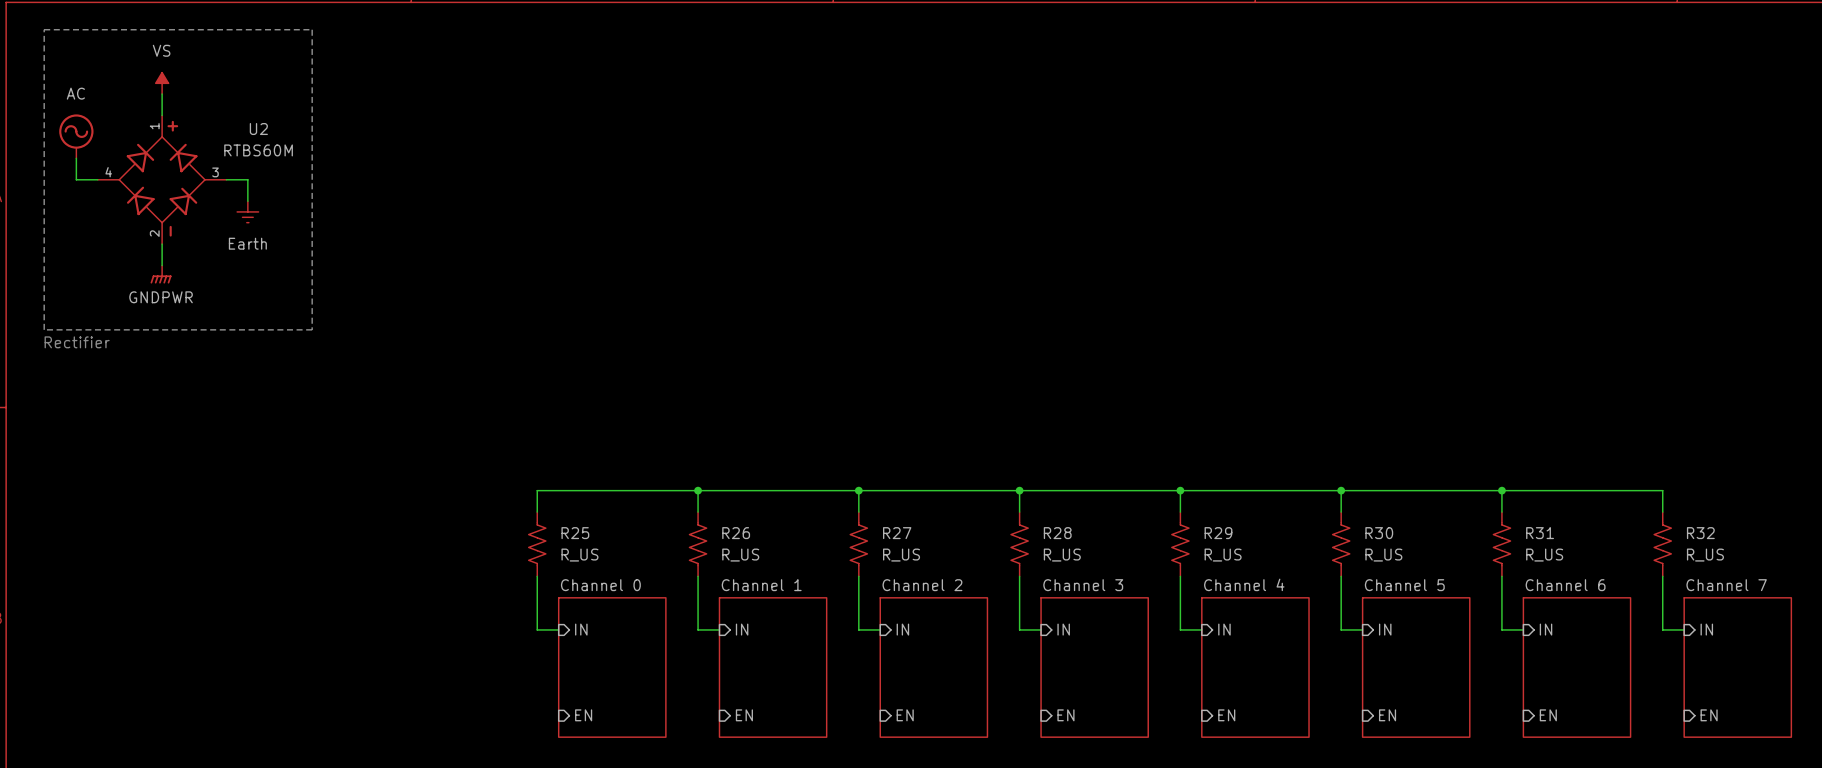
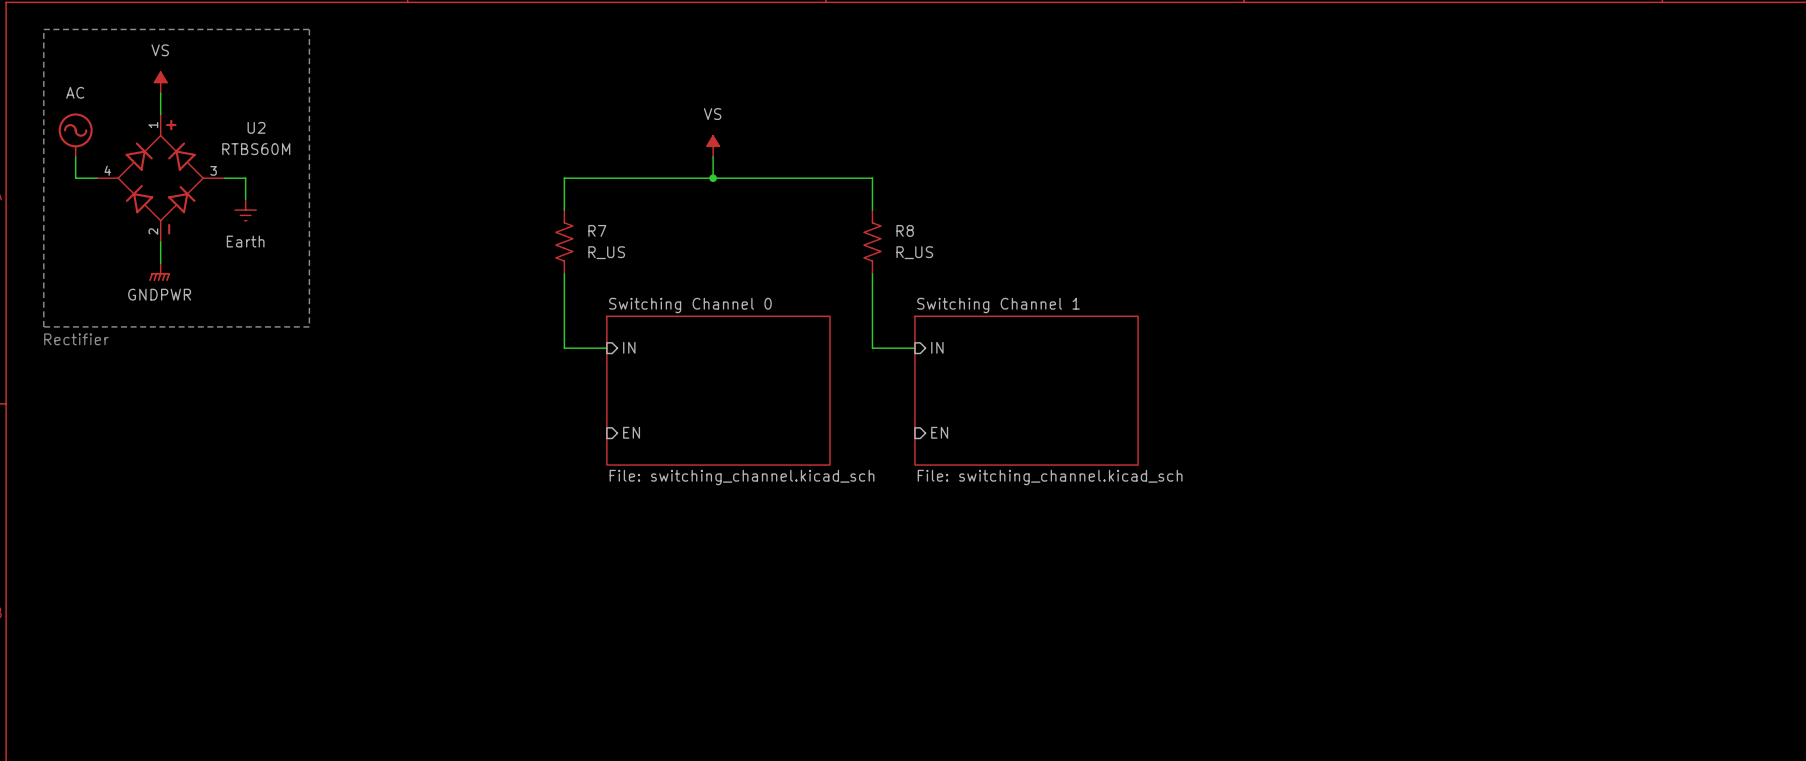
power symbol: none -> VS (713, 146)
wire: none -> (713, 156) (713, 178)
junction: none -> (713, 178)
wire: none -> (564, 210) (564, 178) (872, 178) (872, 210)
R7: none -> R_US (564, 241)
R8: none -> R_US (872, 241)
wire: none -> (564, 273) (564, 348) (606, 348)
wire: none -> (872, 273) (872, 348) (914, 348)
sheet pin: none -> IN (629, 347)
sheet pin: none -> IN (937, 347)
sheet Switching Channel 0: none -> File: switching_channel.kicad_sch (718, 390)
sheet Switching Channel 1: none -> File: switching_channel.kicad_sch (1026, 390)
sheet pin: none -> EN (631, 432)
sheet pin: none -> EN (939, 432)
wire: (698, 490) (698, 512) -> none
junction: (698, 490) -> none
wire: (858, 490) (858, 512) -> none
junction: (858, 490) -> none
wire: (1019, 490) (1019, 512) -> none
junction: (1019, 490) -> none
wire: (1180, 490) (1180, 512) -> none
junction: (1180, 490) -> none
wire: (1341, 490) (1341, 512) -> none
junction: (1341, 490) -> none
wire: (1501, 490) (1501, 512) -> none
junction: (1501, 490) -> none
wire: (537, 512) (537, 490) (1662, 490) (1662, 512) -> none
R25: R_US (537, 544) -> none
R26: R_US (698, 544) -> none
R27: R_US (858, 544) -> none
R28: R_US (1019, 544) -> none
R29: R_US (1180, 544) -> none
R30: R_US (1341, 544) -> none
R31: R_US (1501, 544) -> none
R32: R_US (1662, 544) -> none
wire: (537, 576) (537, 629) (558, 629) -> none
wire: (698, 576) (698, 629) (719, 629) -> none
wire: (858, 576) (858, 629) (880, 629) -> none
wire: (1019, 576) (1019, 629) (1041, 629) -> none
wire: (1180, 576) (1180, 629) (1201, 629) -> none
wire: (1341, 576) (1341, 629) (1362, 629) -> none
wire: (1501, 576) (1501, 629) (1523, 629) -> none
wire: (1662, 576) (1662, 629) (1684, 629) -> none
sheet pin: IN (581, 629) -> none
sheet pin: IN (742, 629) -> none
sheet pin: IN (902, 629) -> none
sheet pin: IN (1063, 629) -> none
sheet pin: IN (1224, 629) -> none
sheet pin: IN (1385, 629) -> none
sheet pin: IN (1546, 629) -> none
sheet pin: IN (1706, 629) -> none
sheet Channel 0: (612, 667) -> none
sheet Channel 1: (773, 667) -> none
sheet Channel 2: (933, 667) -> none
sheet Channel 3: (1094, 667) -> none
sheet Channel 4: (1255, 667) -> none
sheet Channel 5: (1416, 667) -> none
sheet Channel 6: (1576, 667) -> none
sheet Channel 7: (1737, 667) -> none
sheet pin: EN (583, 715) -> none
sheet pin: EN (744, 715) -> none
sheet pin: EN (905, 715) -> none
sheet pin: EN (1065, 715) -> none
sheet pin: EN (1226, 715) -> none
sheet pin: EN (1387, 715) -> none
sheet pin: EN (1548, 715) -> none
sheet pin: EN (1709, 715) -> none

